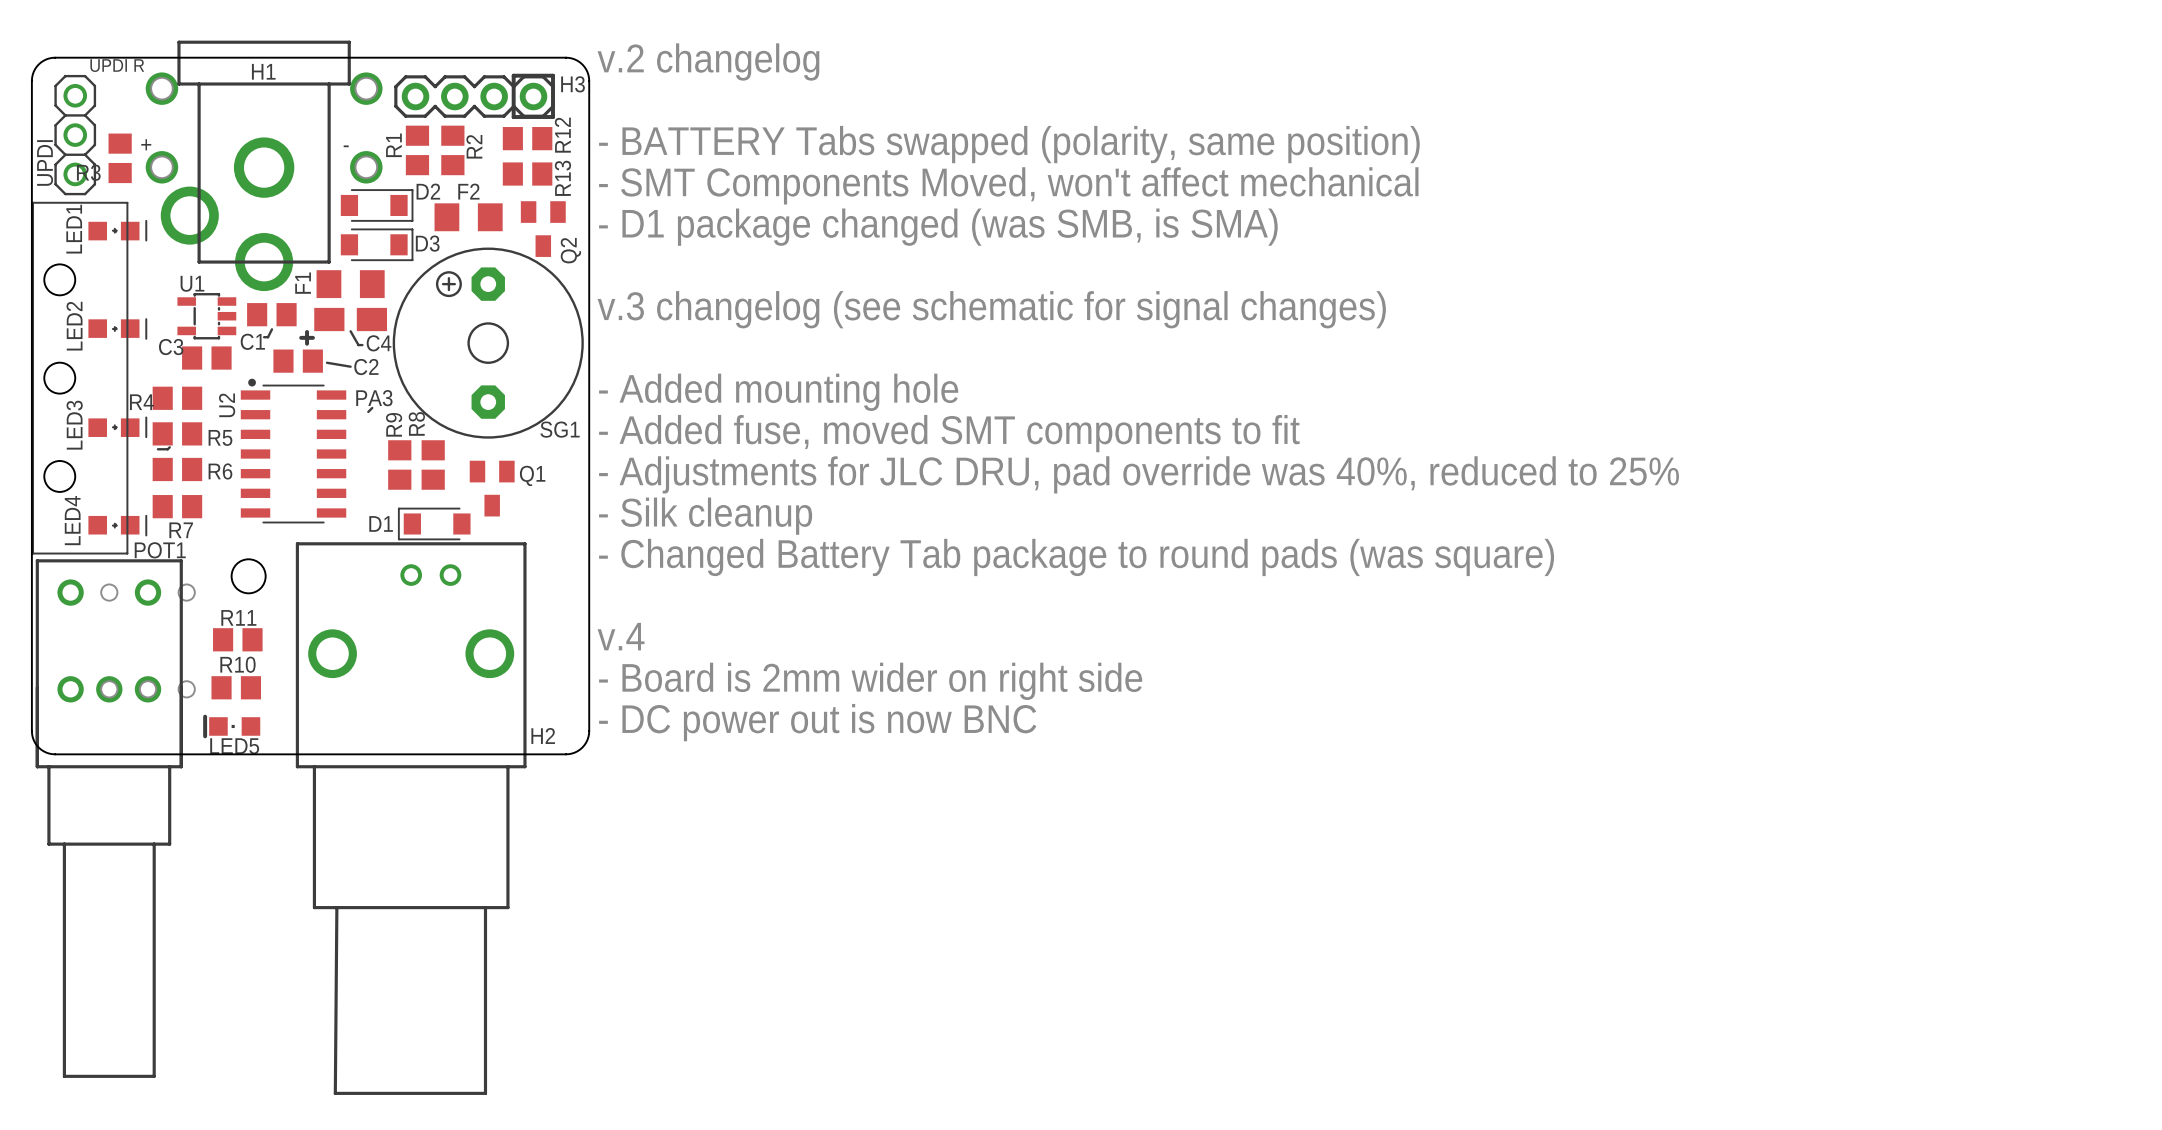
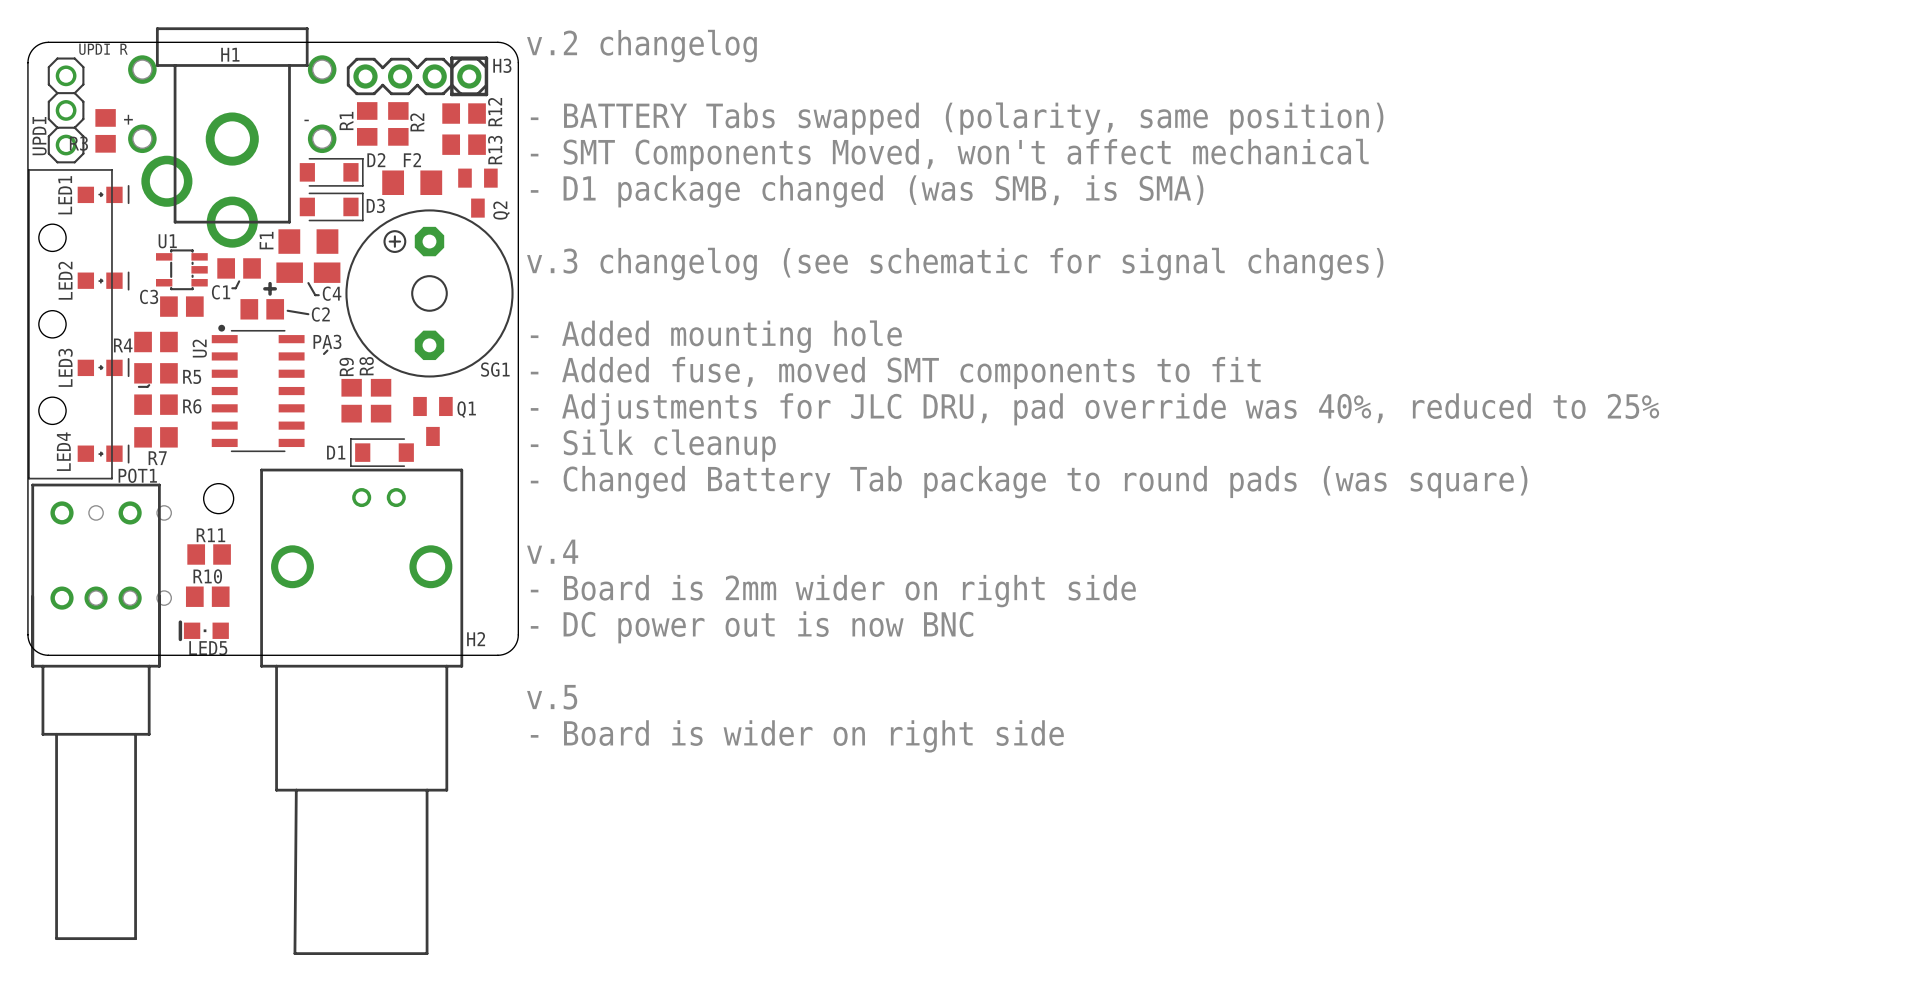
text: none -> v.5 (552, 697)
text: none -> - Board is wider on right side (797, 736)

